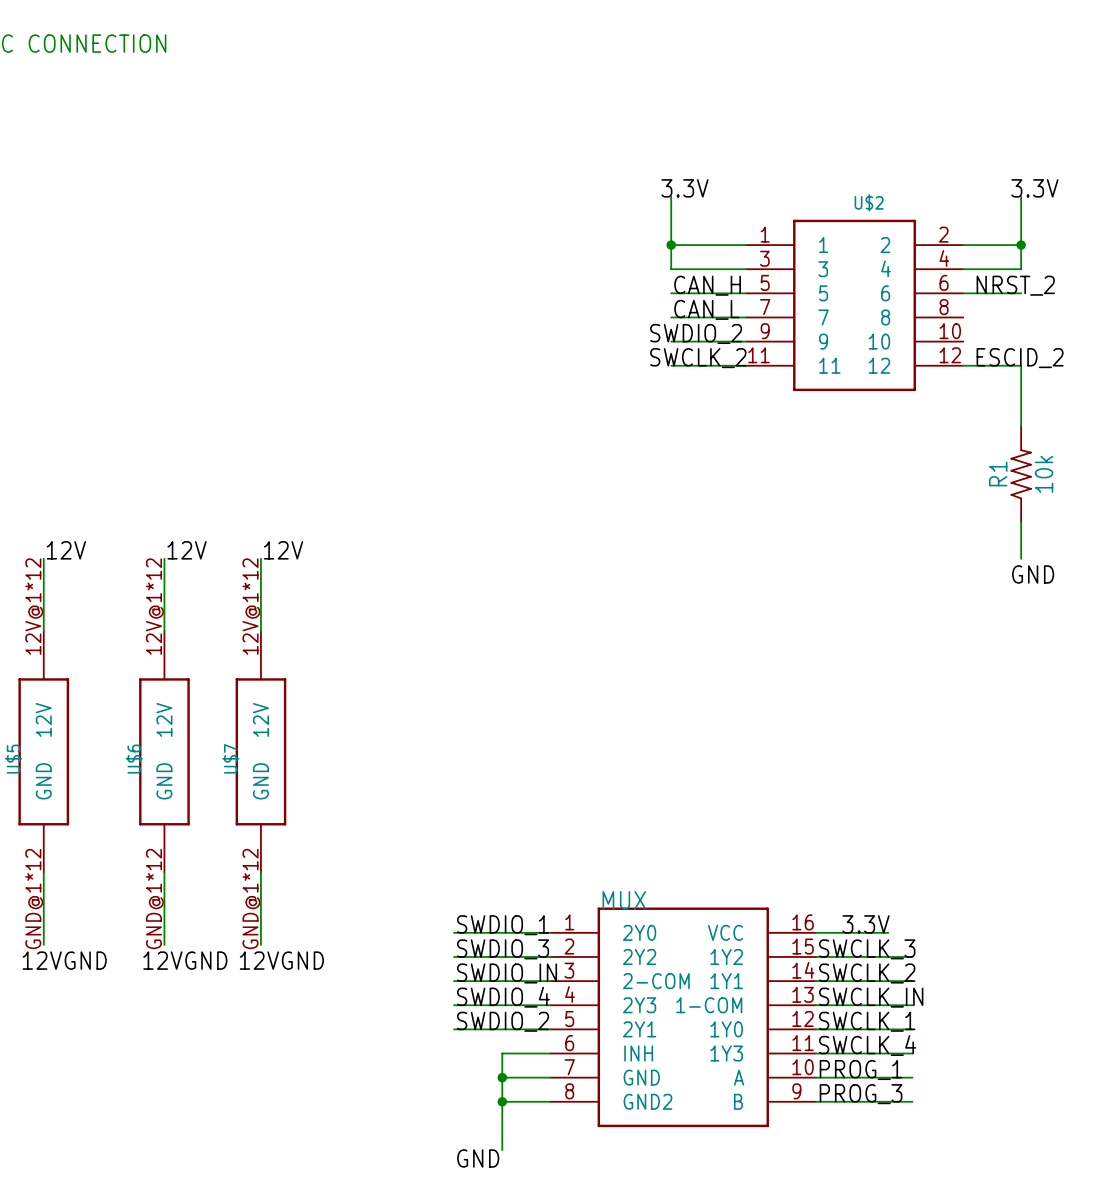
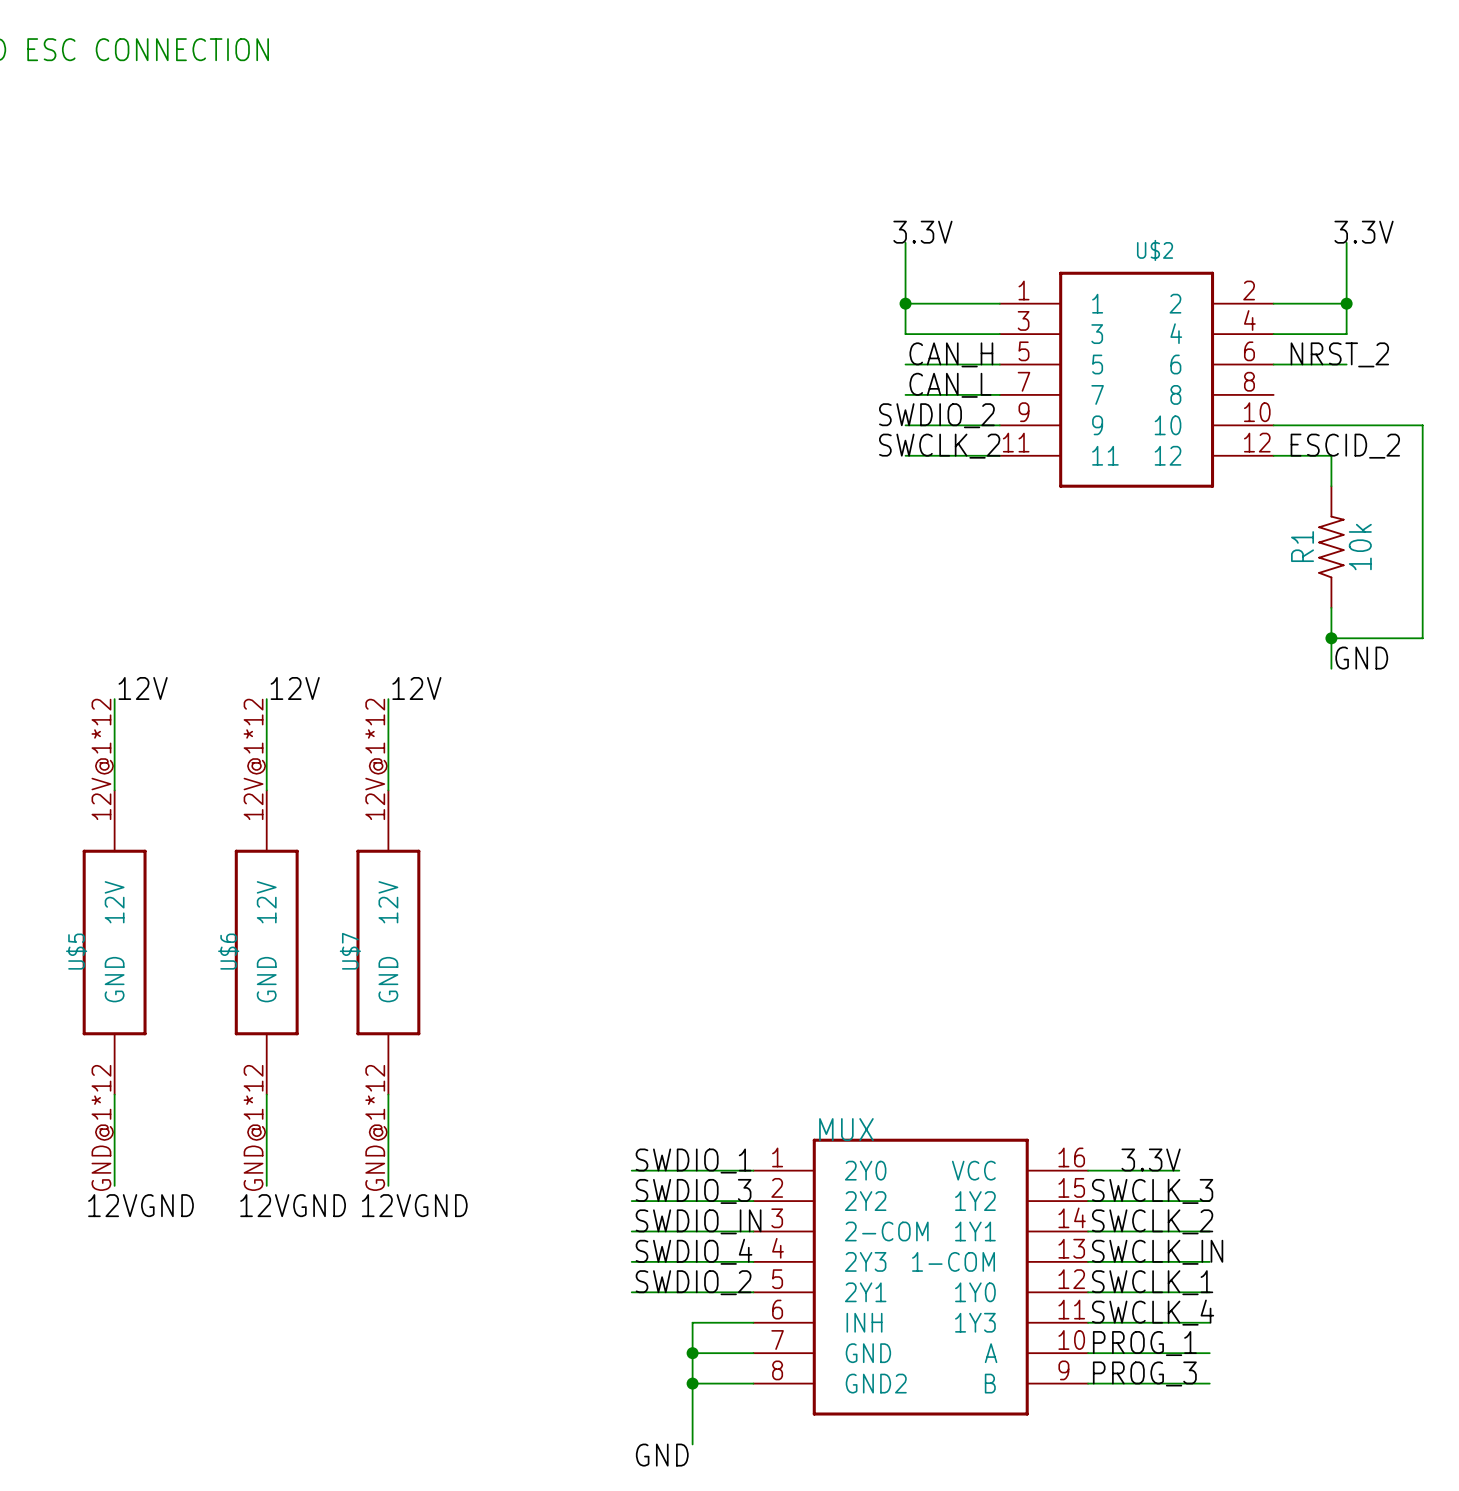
wire: none -> (1273, 425) (1422, 425) (1422, 638) (1331, 638)
wire: (1009, 365) (1021, 365) (1021, 426) -> (1331, 455) (1331, 486)
R1 position: (1021, 474) -> (1331, 547)
wire: none -> (1331, 607) (1331, 668)
junction: none -> (1331, 638)
wire: (1021, 522) (1021, 558) -> none
label position: GND (1033, 574) -> GND (1361, 658)

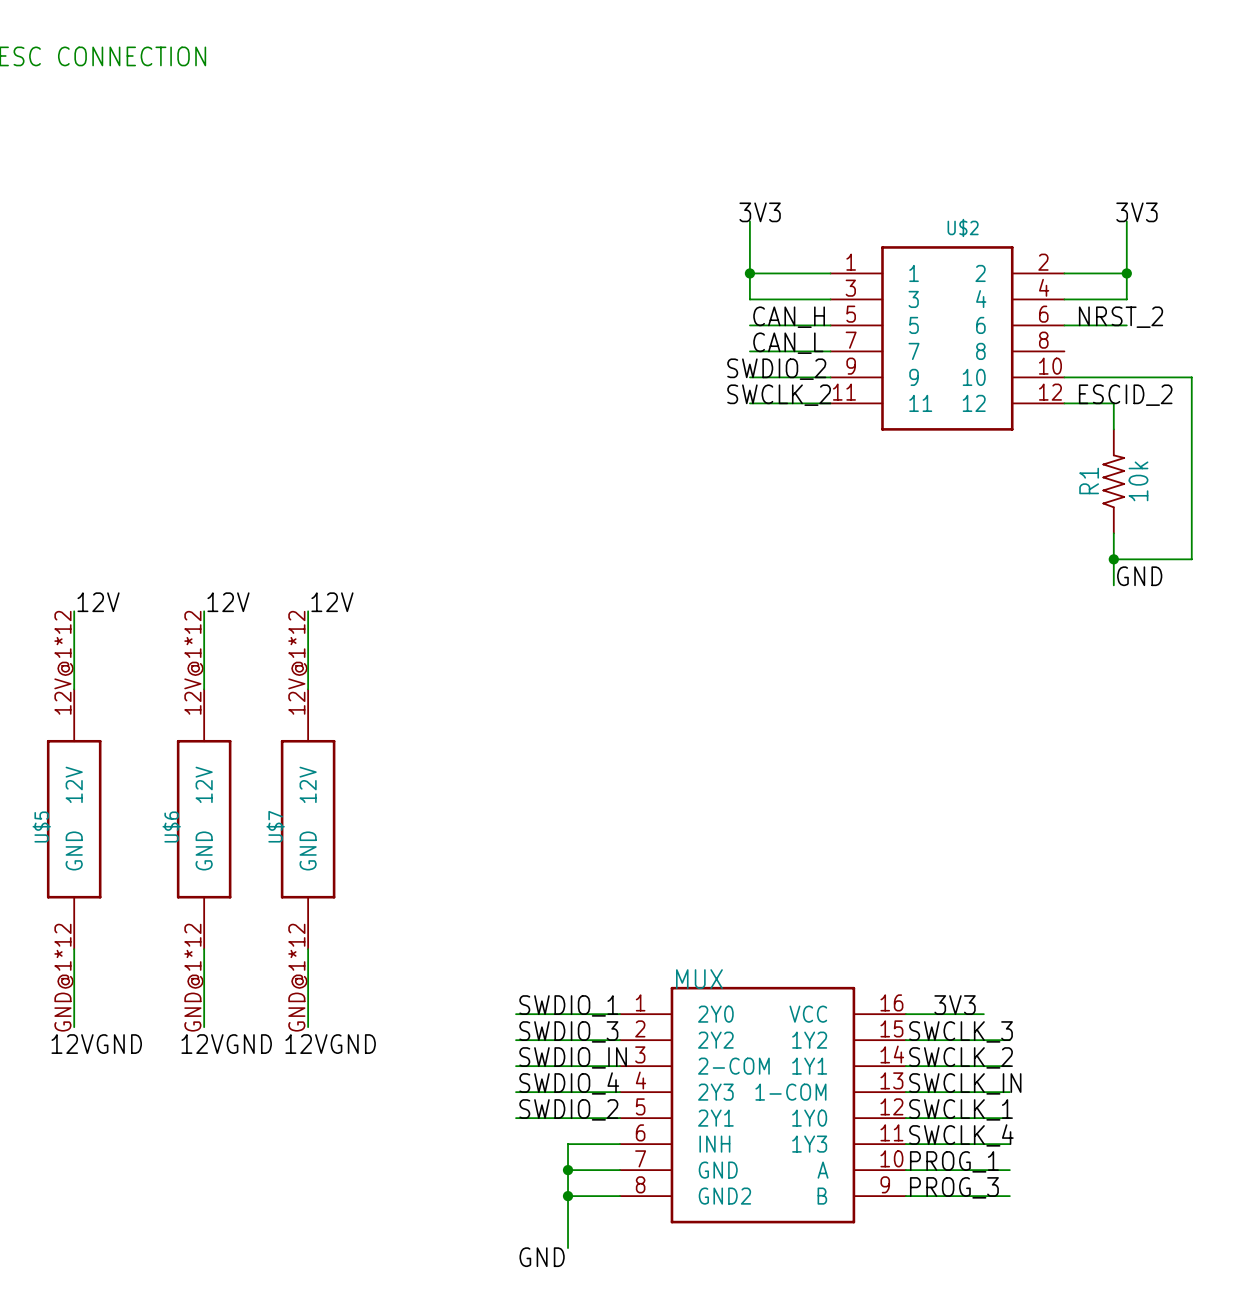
label: 3.3V (922, 232) -> 3V3 (760, 212)
label: 3.3V (1364, 232) -> 3V3 (1136, 212)
label: 3.3V (1151, 1160) -> 3V3 (955, 1005)

